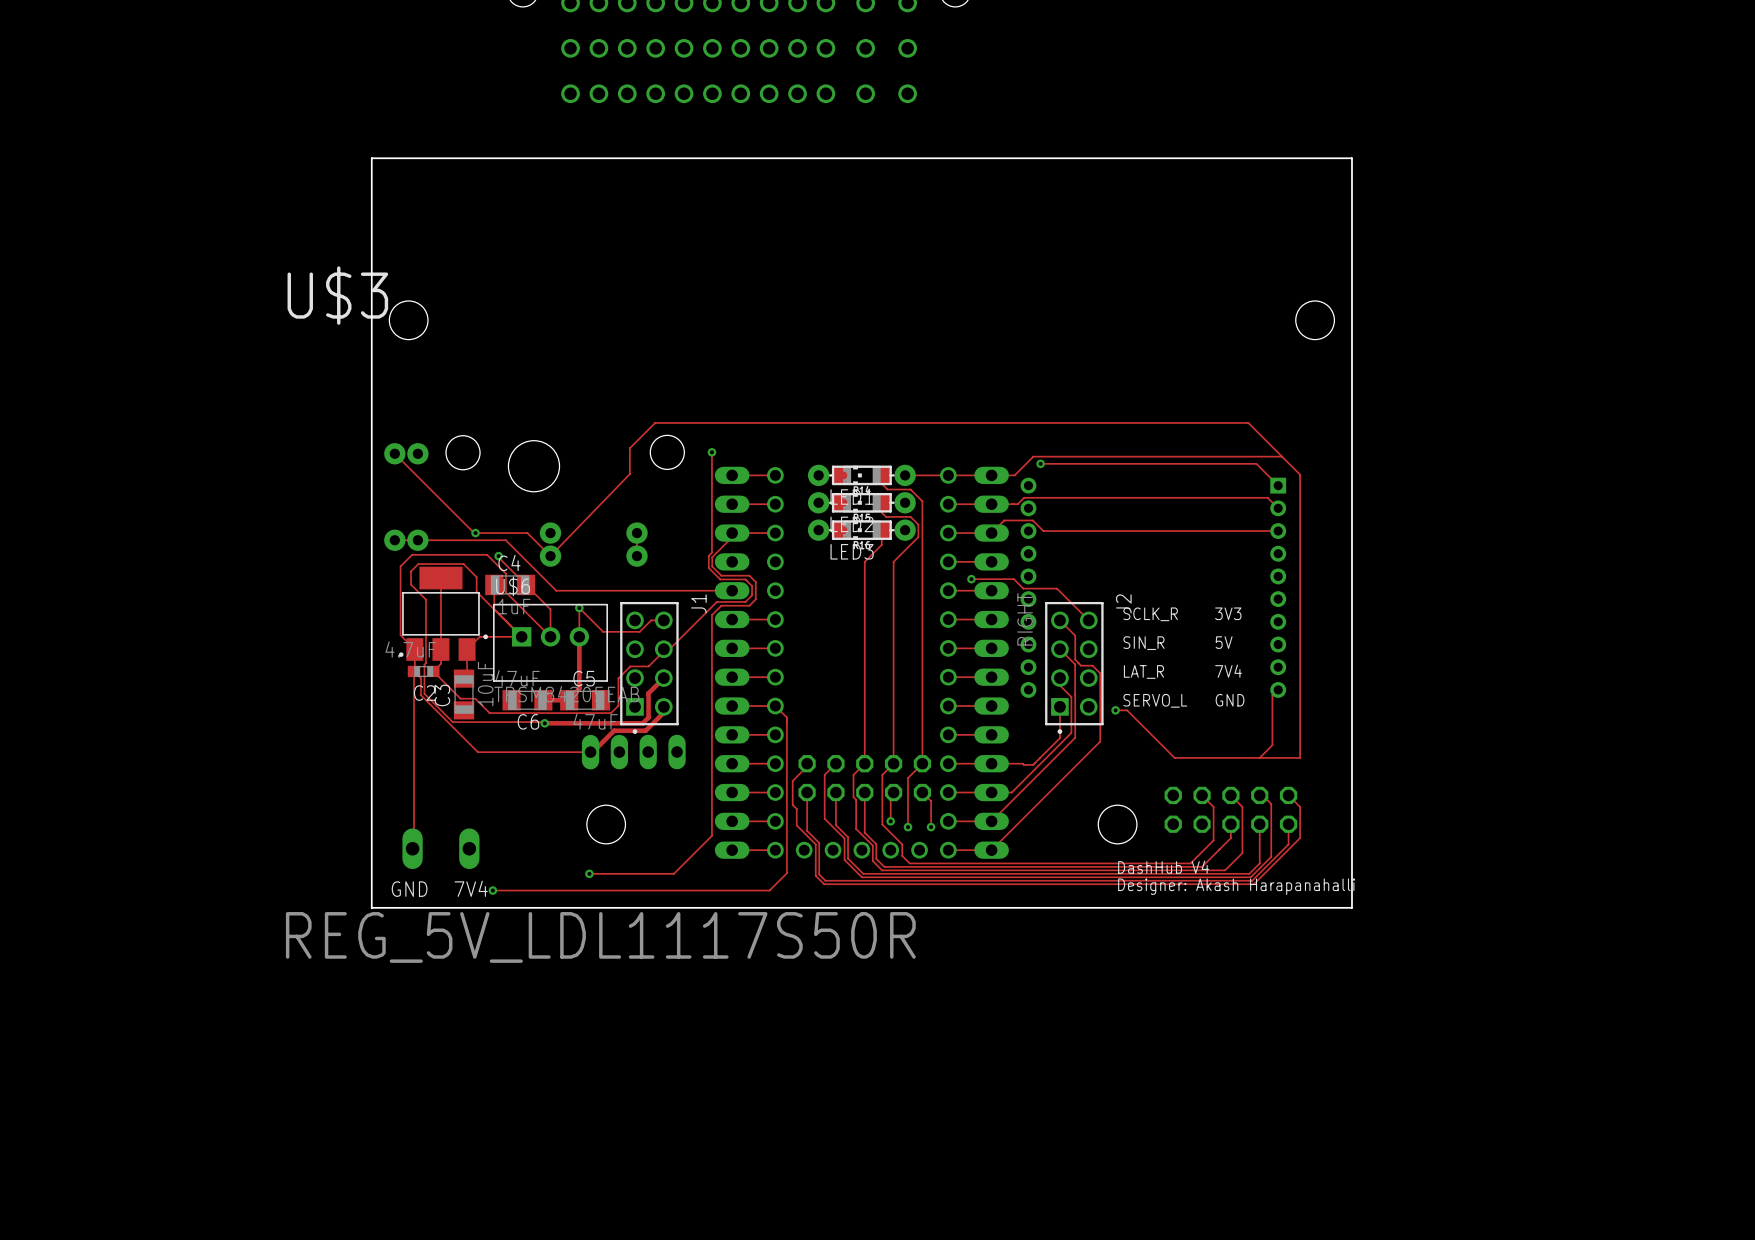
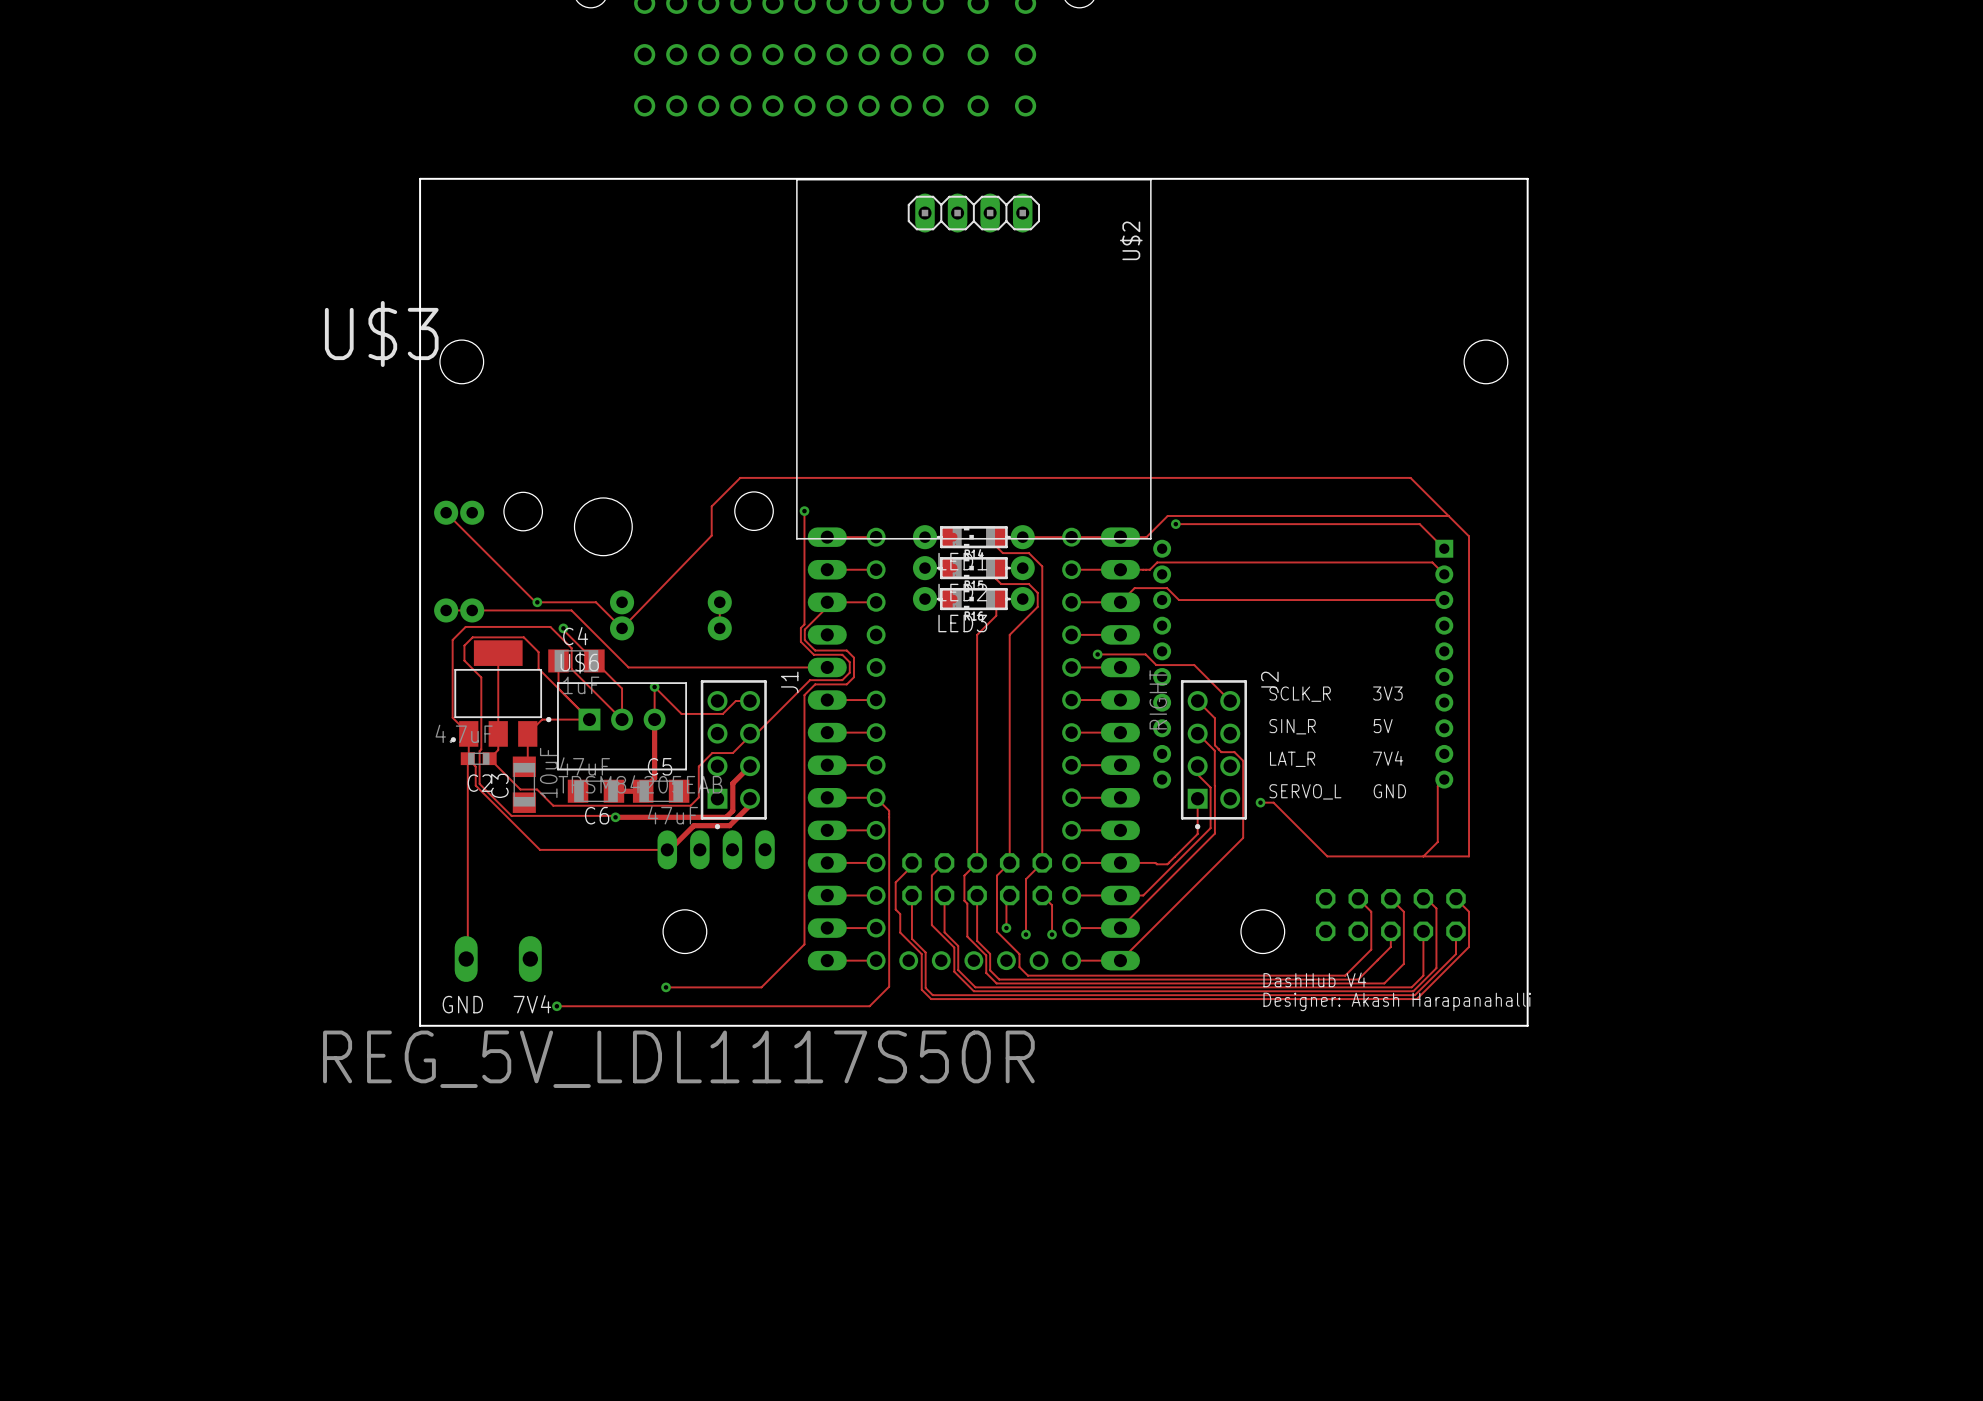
U$2: none -> (973, 359)

